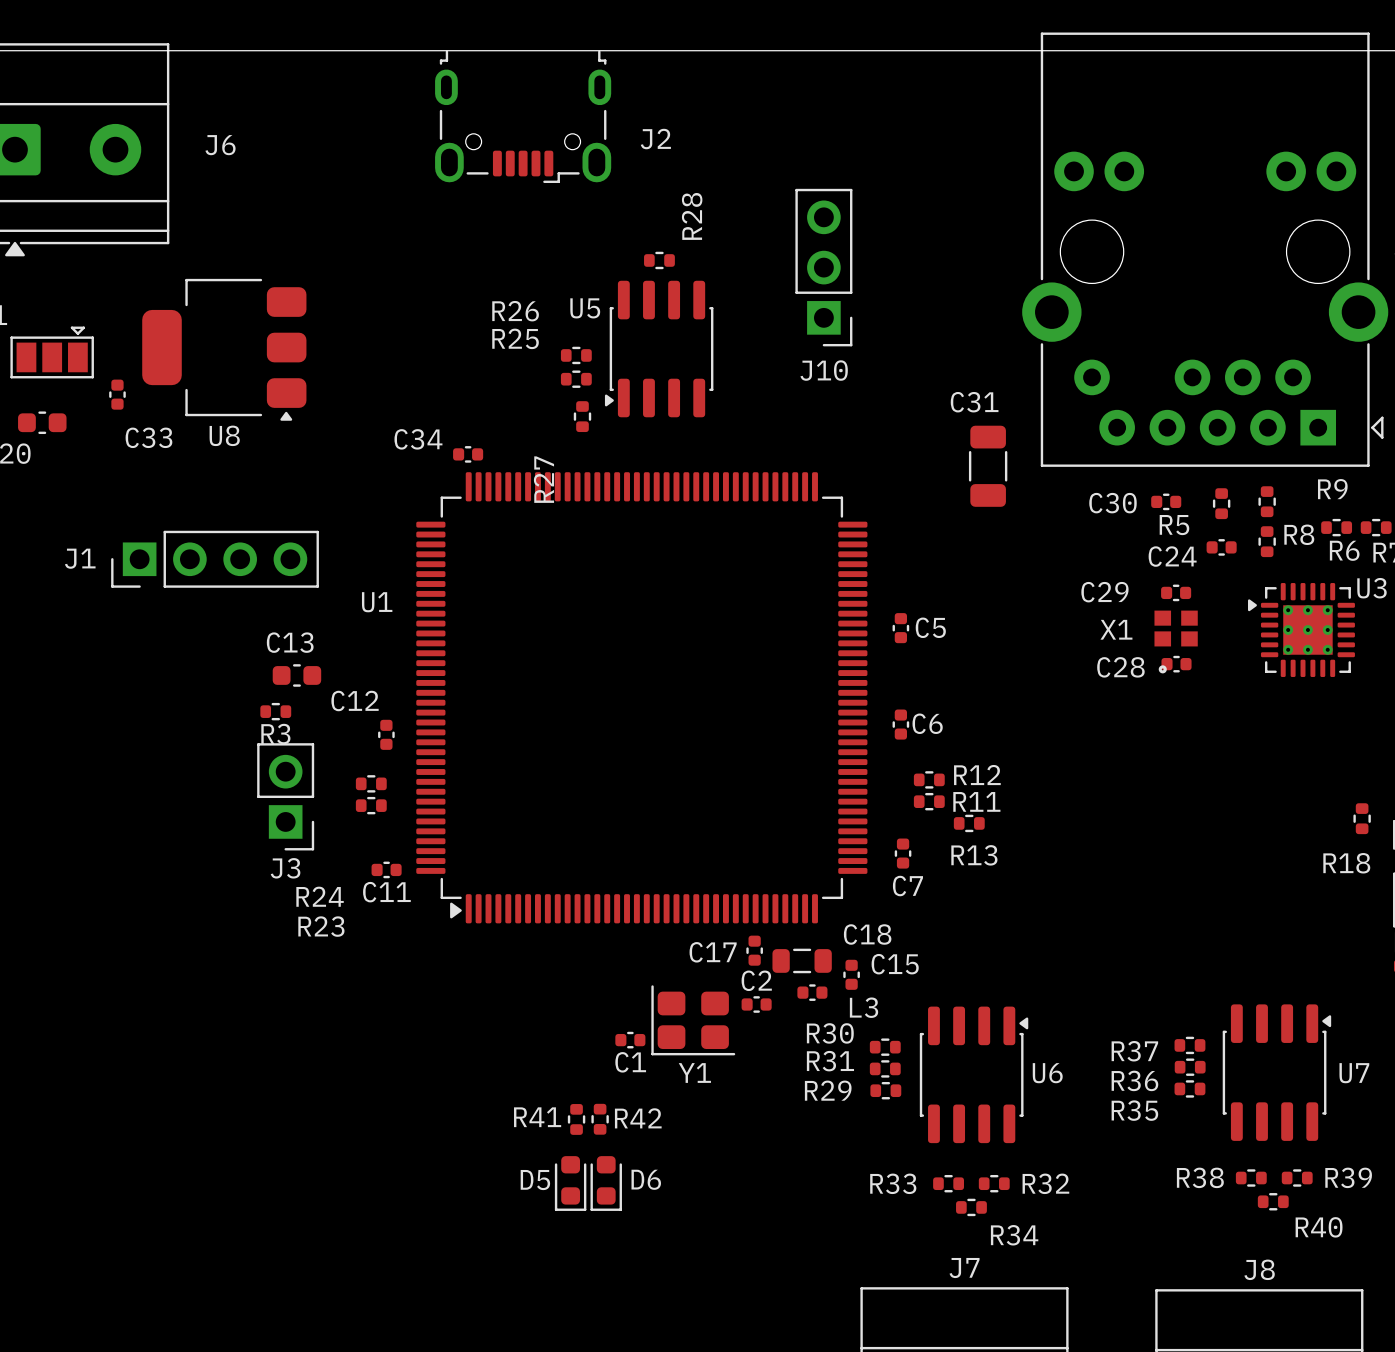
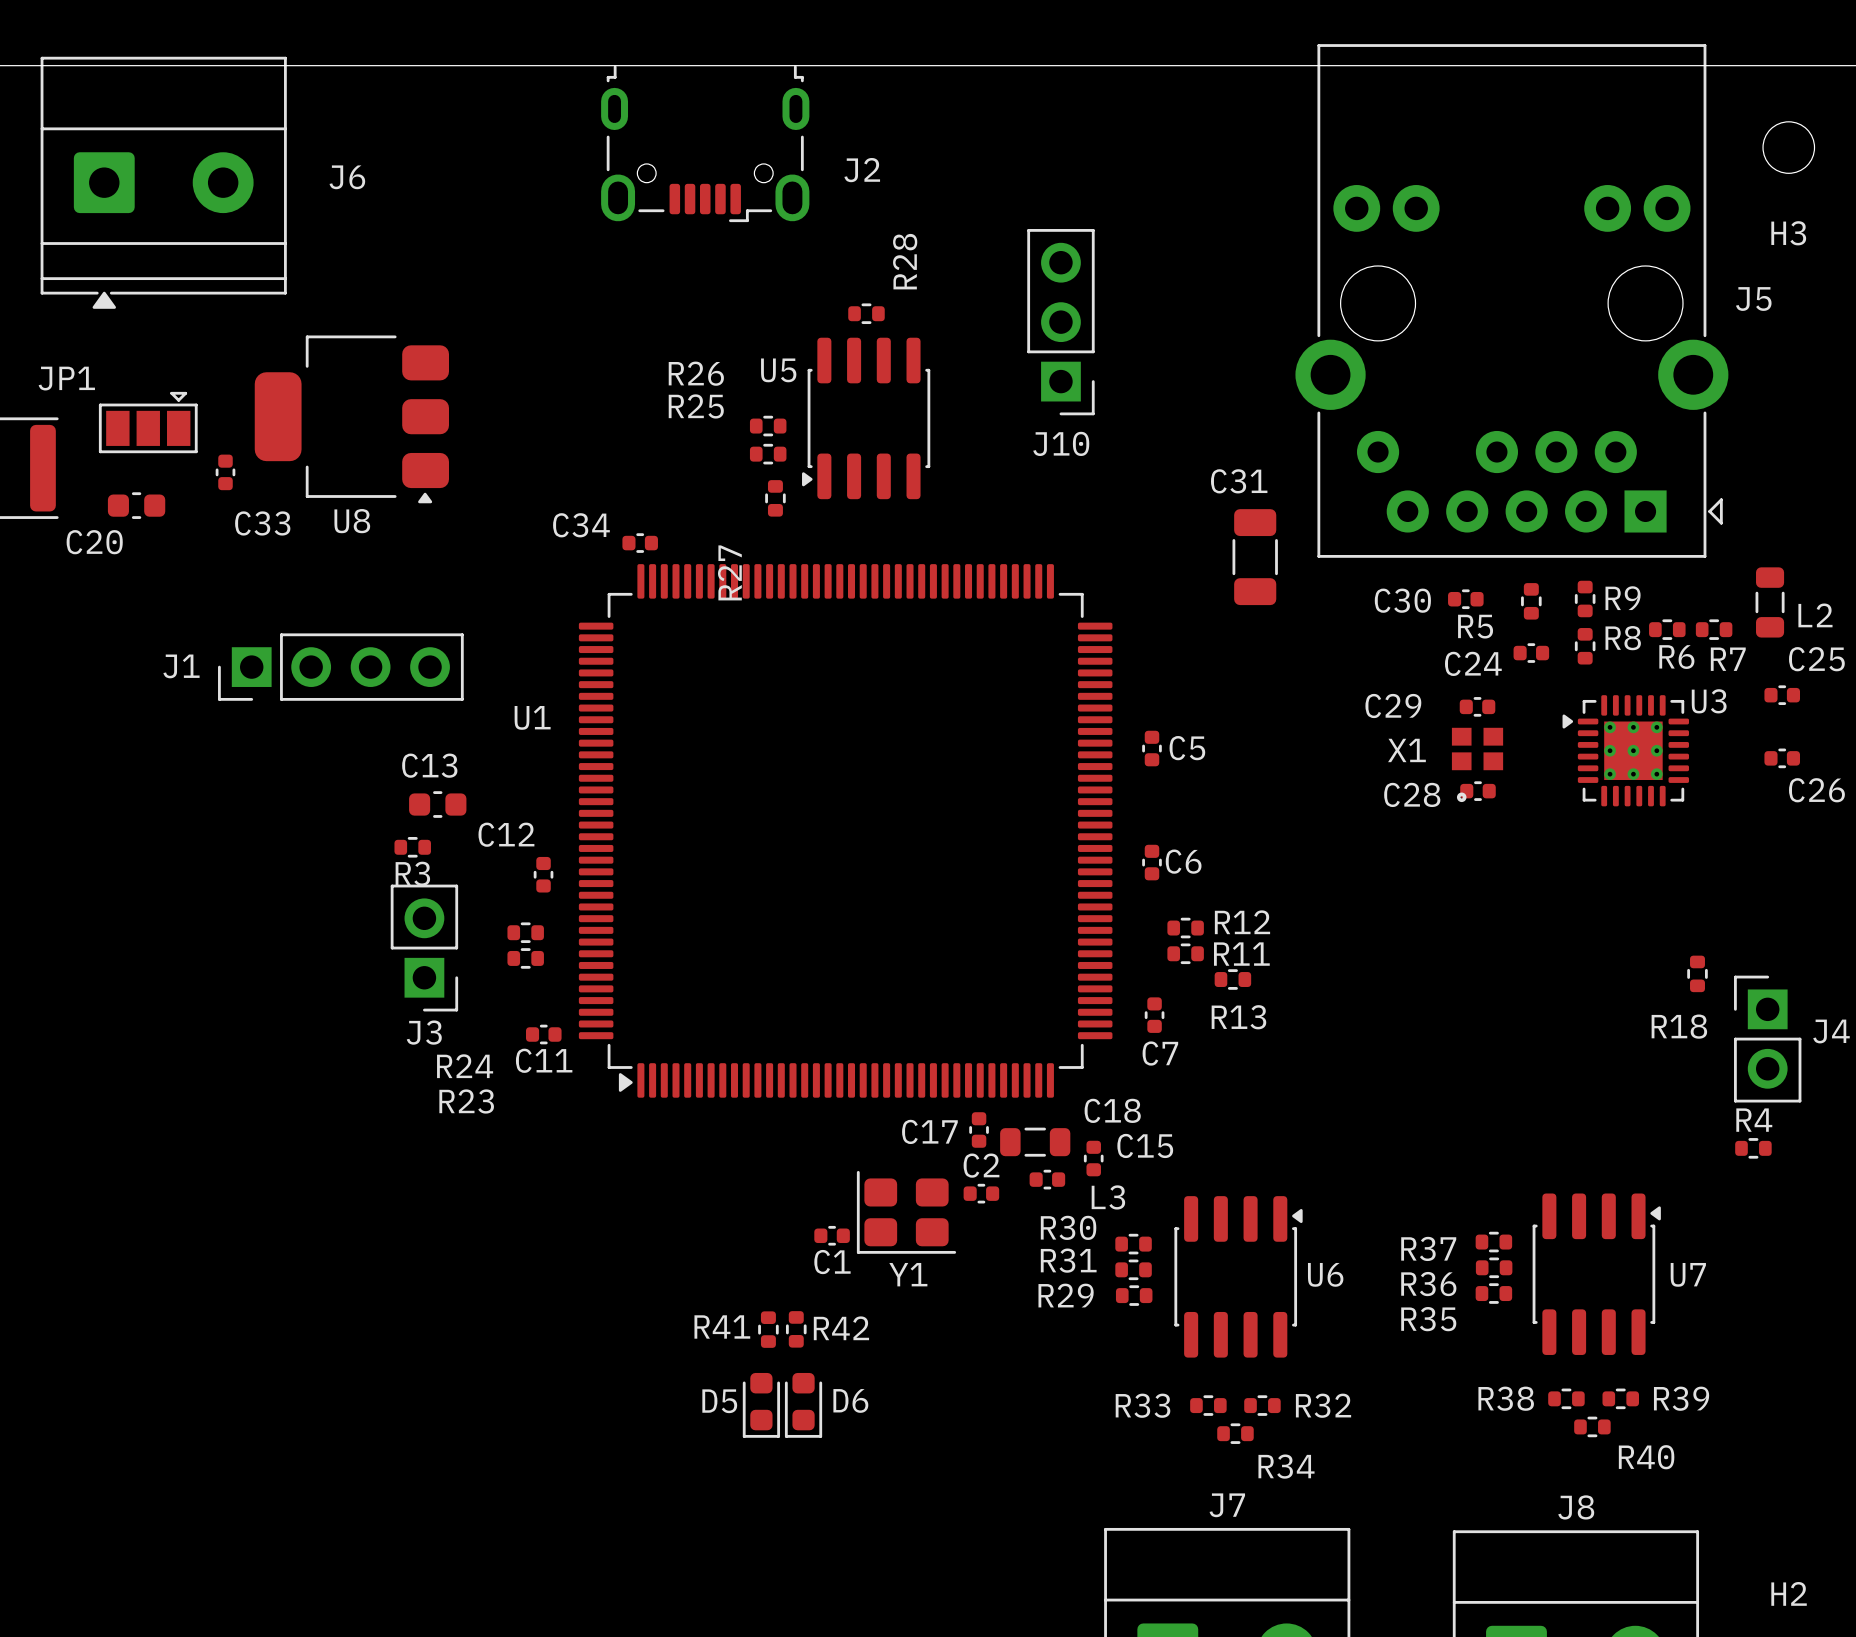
R9 name position: R9 (1332, 489) -> R9 (1623, 598)

